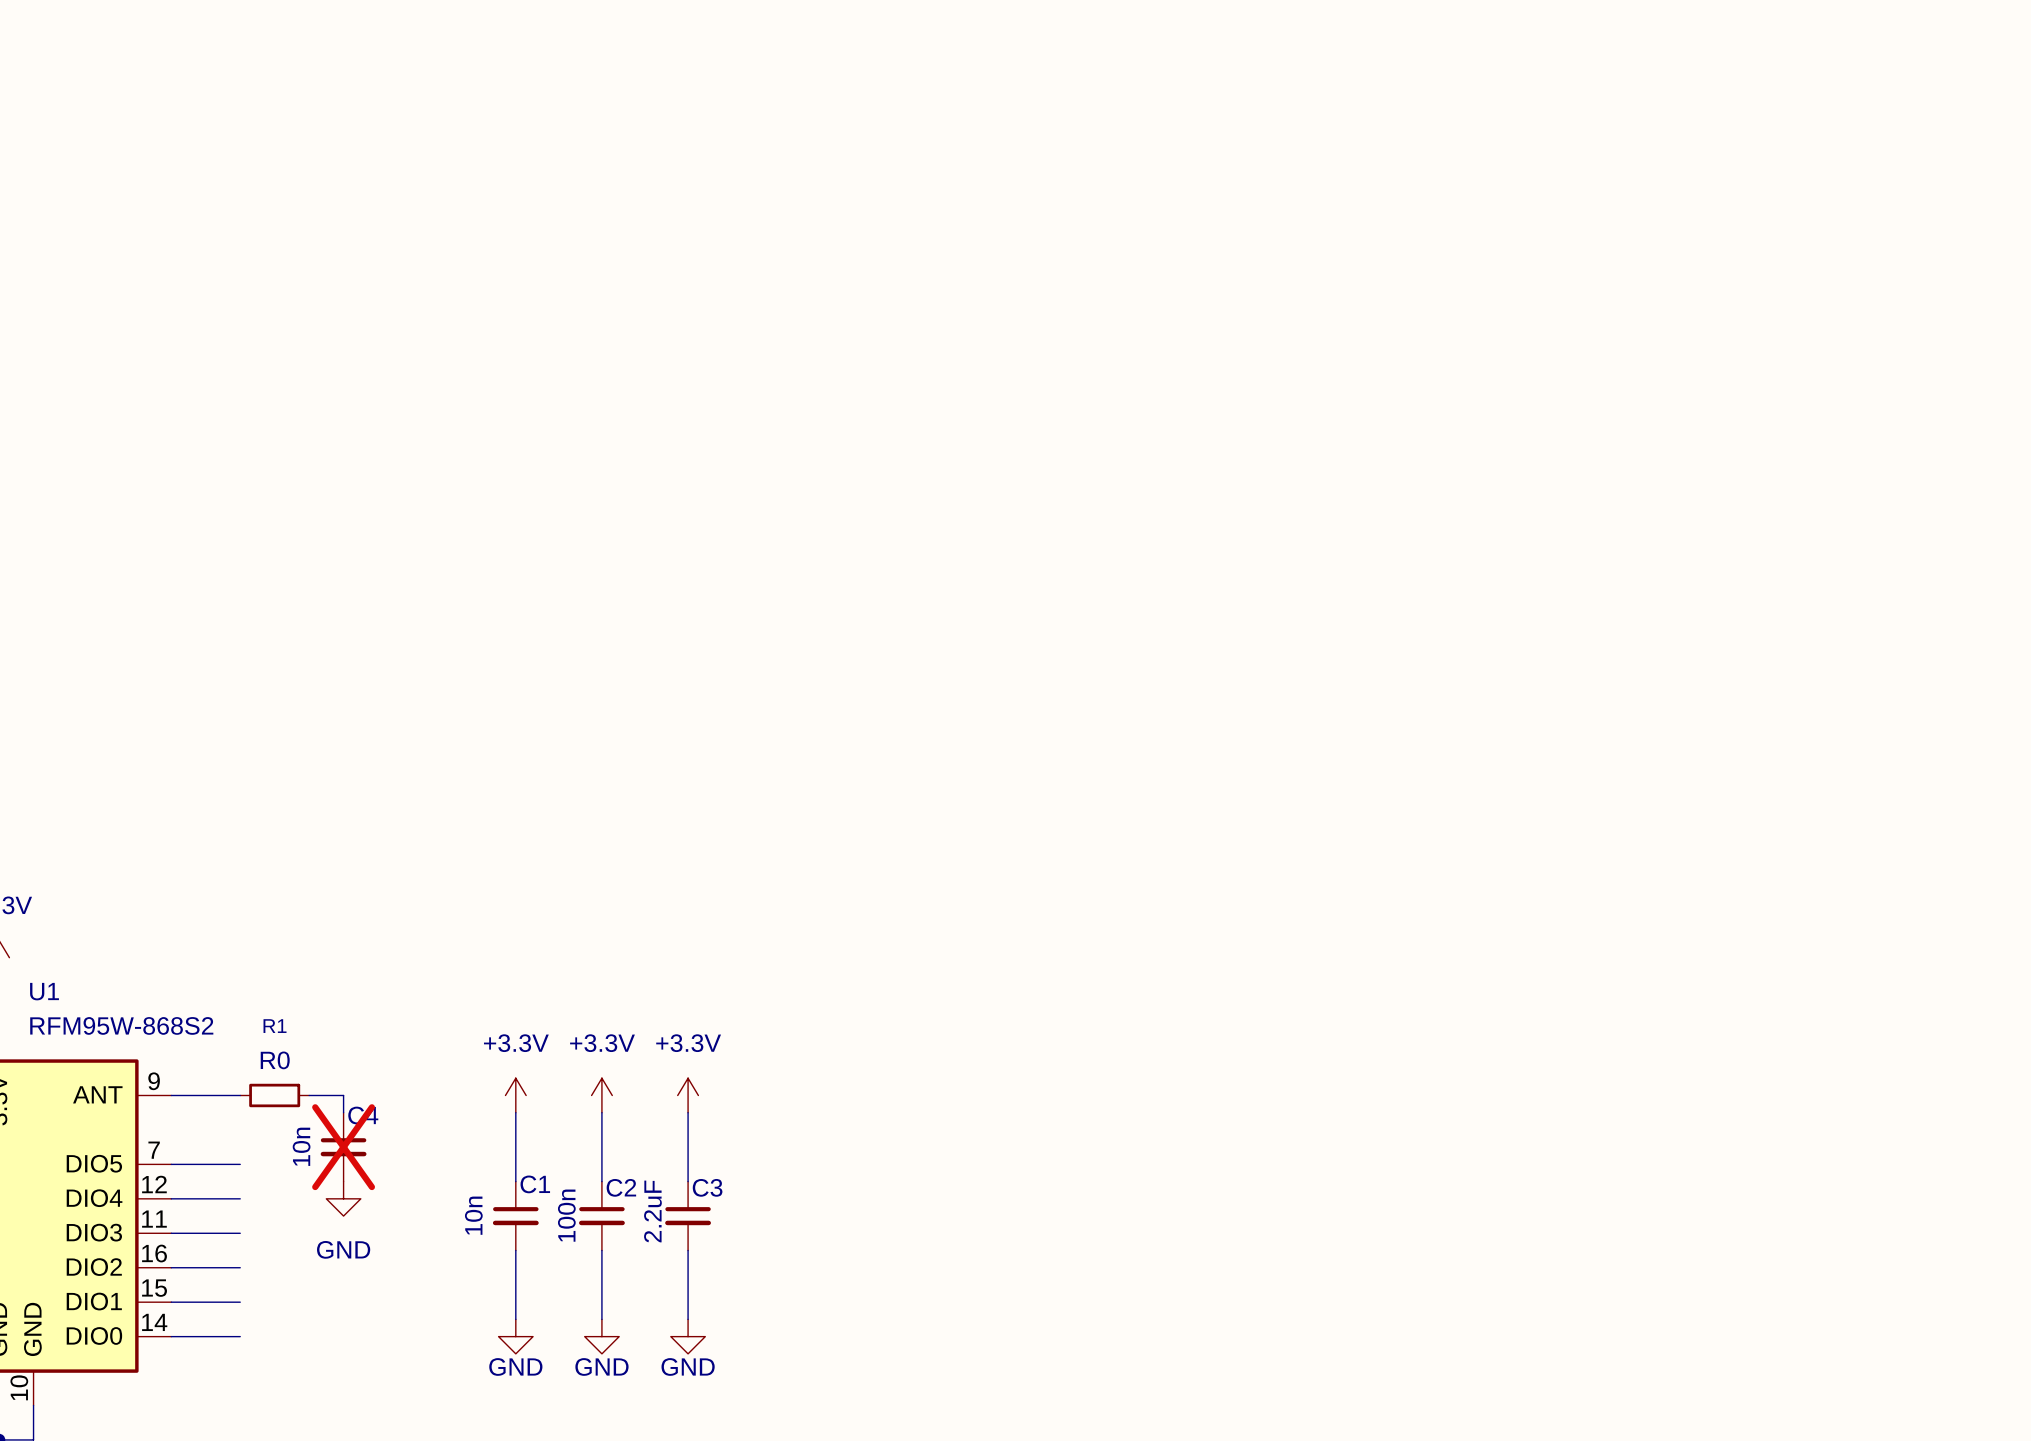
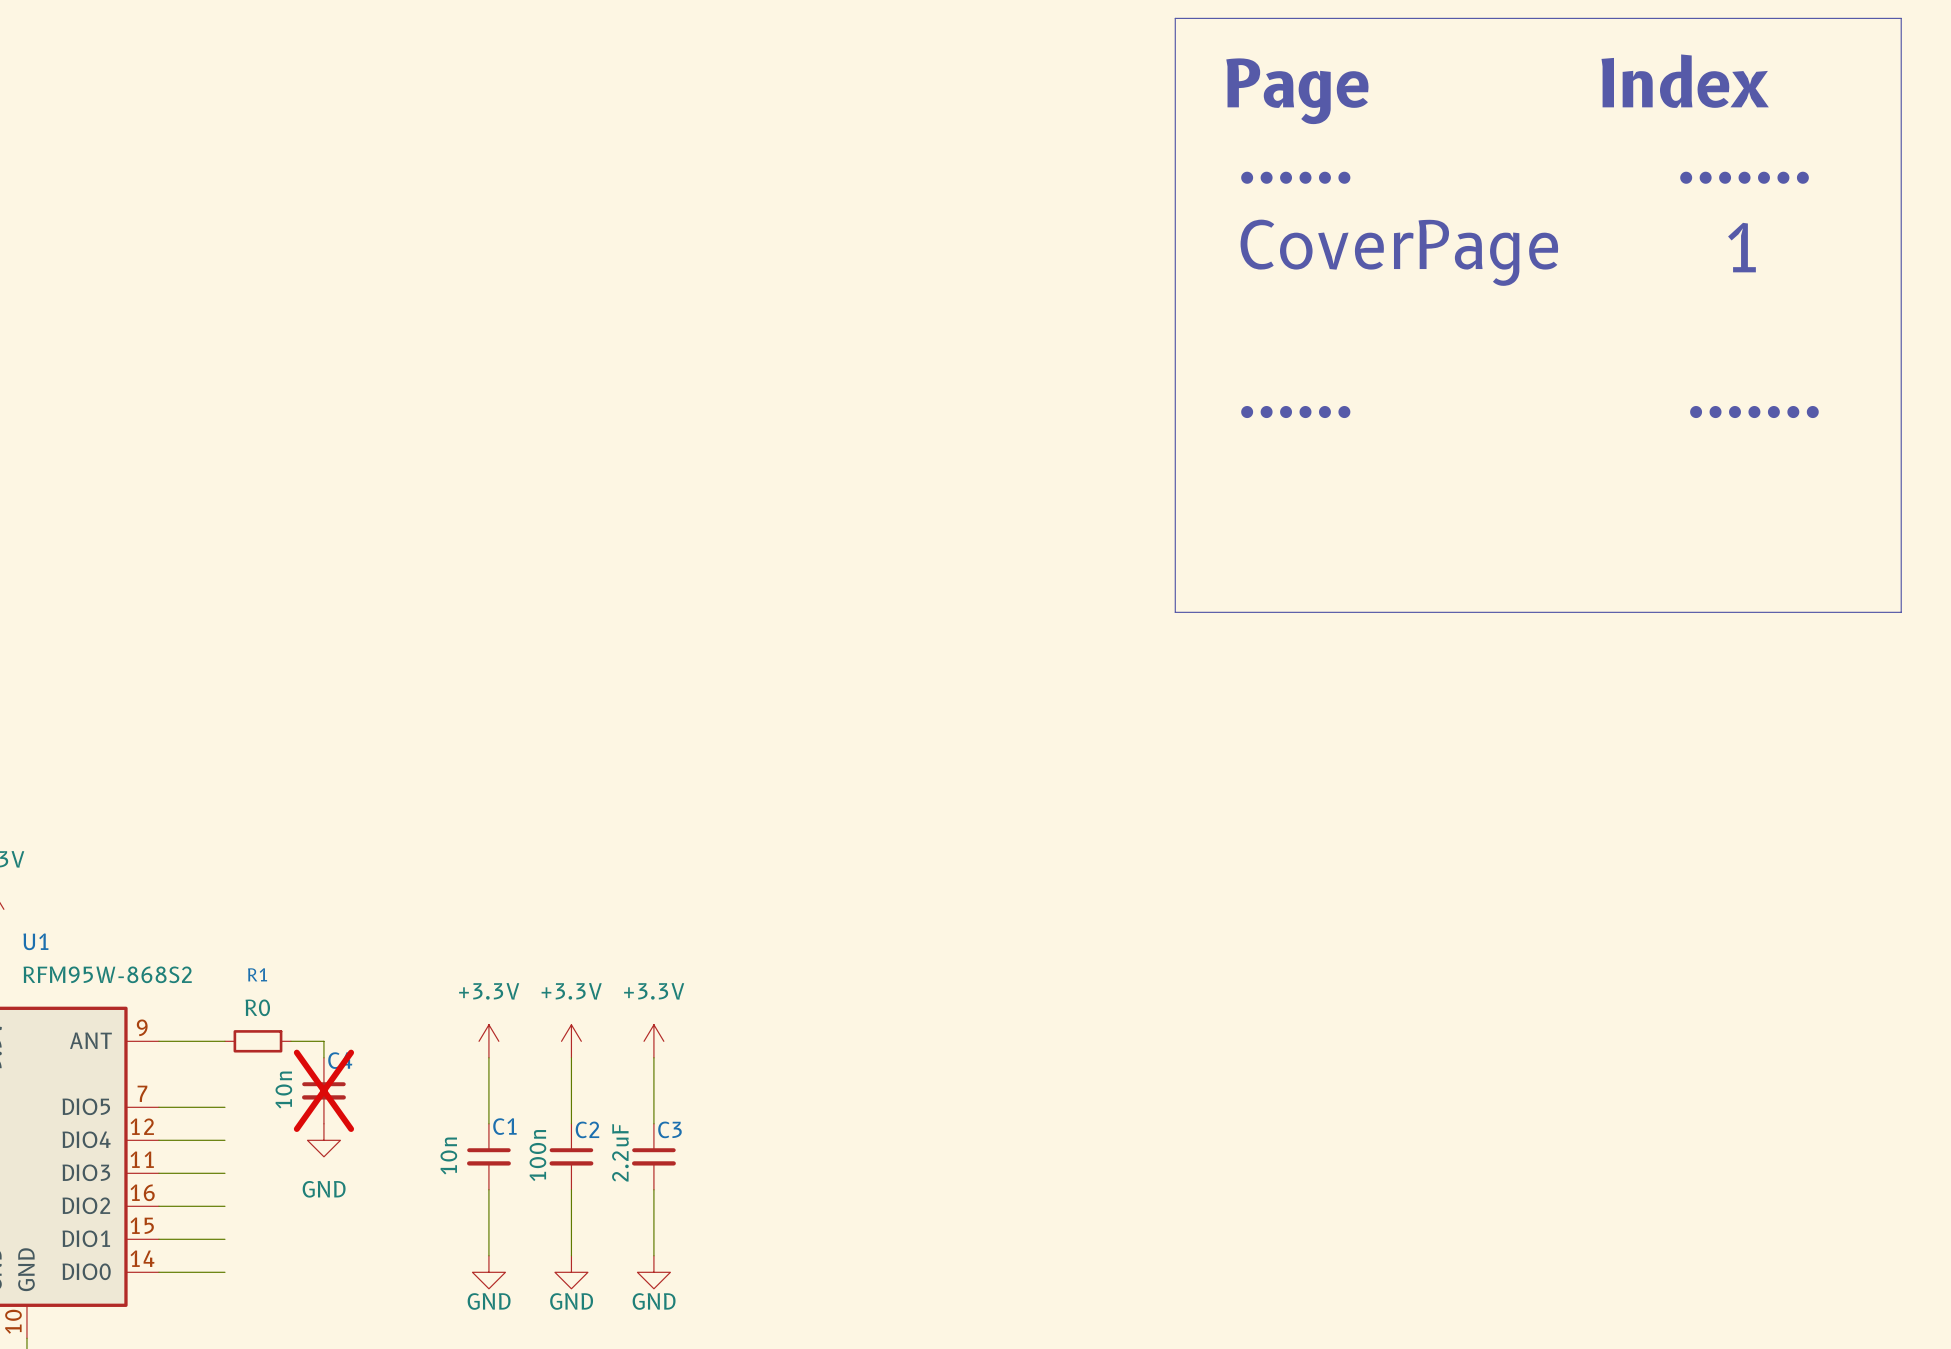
line: none -> (1175, 18) (1901, 18) (1901, 612) (1175, 612) (1175, 18)
text: none -> Index (1685, 81)
text: none -> Page (1297, 91)
text: none -> ...... (1295, 177)
text: none -> ....... (1744, 177)
text: none -> 1 (1741, 247)
text: none -> CoverPage (1399, 252)
text: none -> ...... (1295, 412)
text: none -> ....... (1754, 412)

